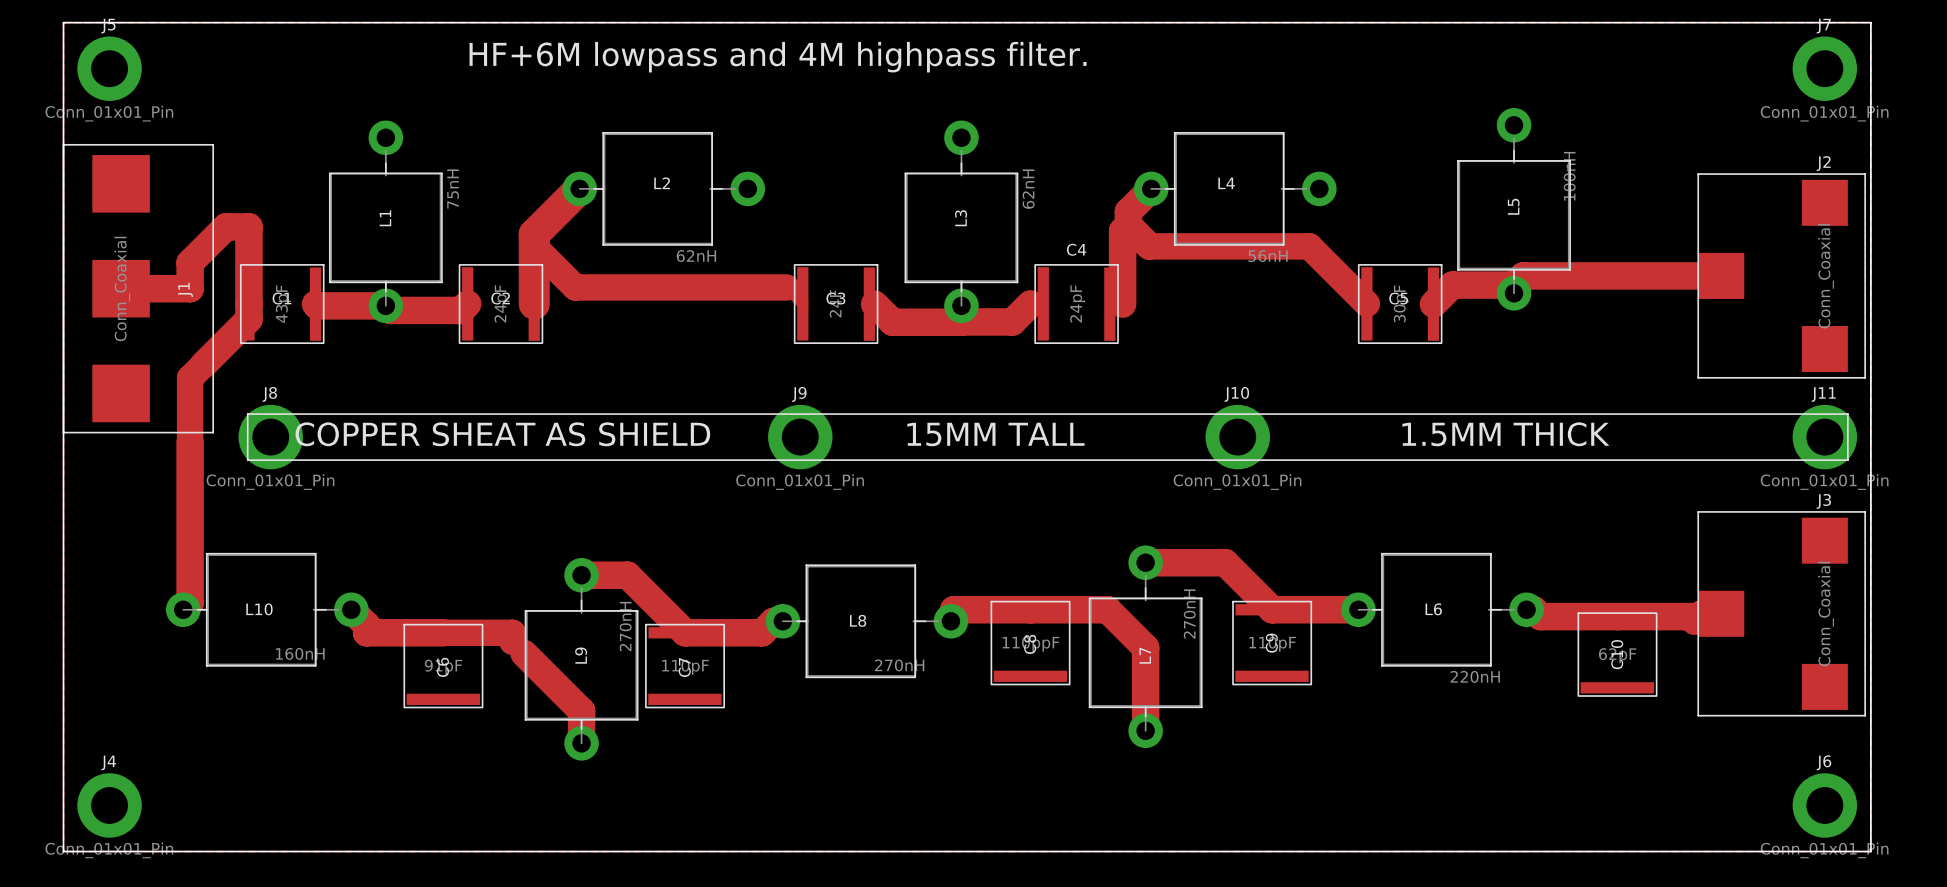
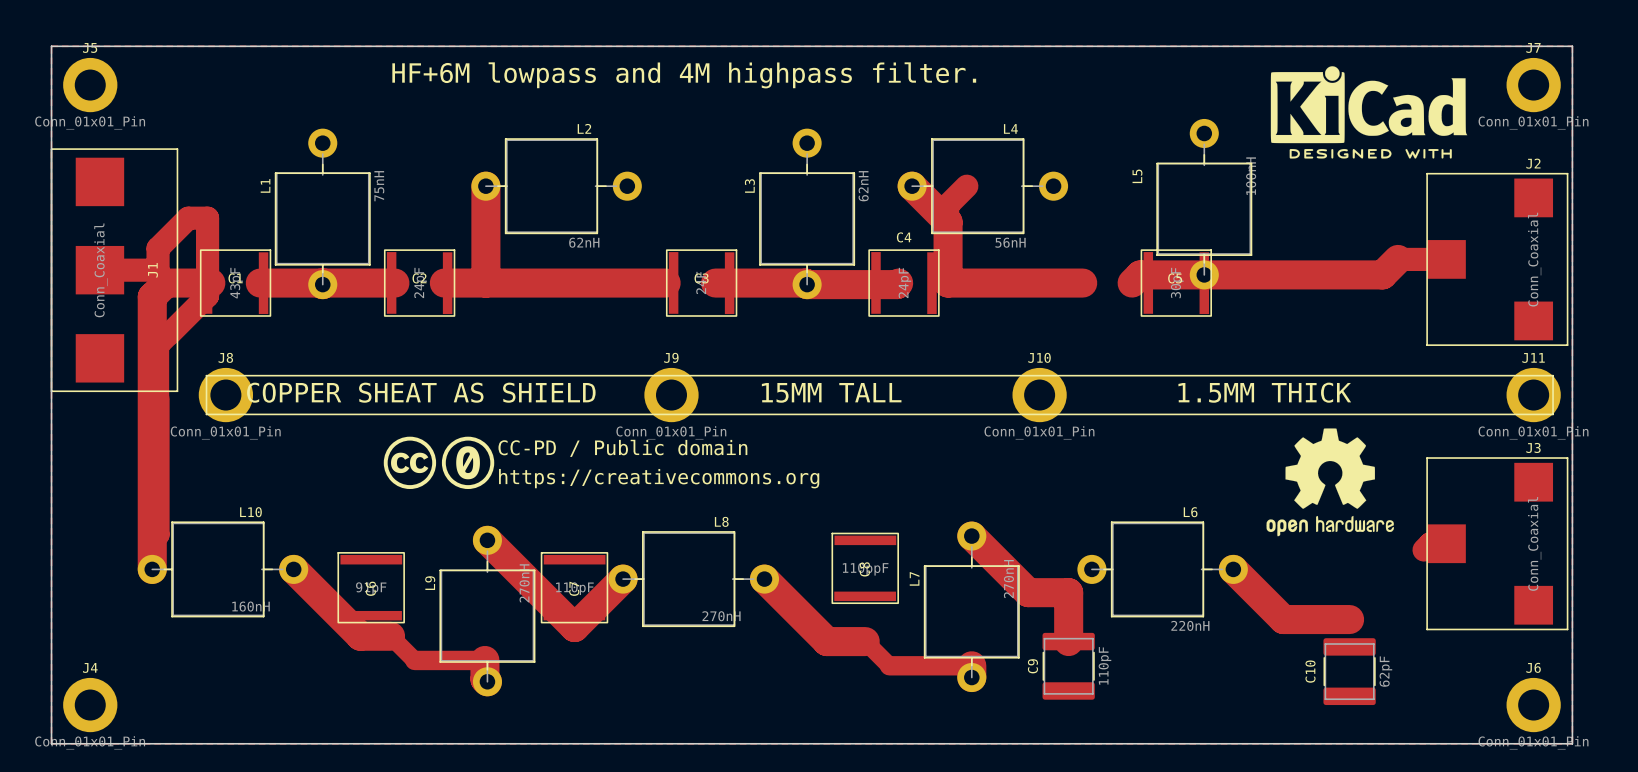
drawing: none -> [1270, 66, 1468, 159]
L2 name position: L2 (662, 183) -> L2 (584, 128)
L4 name position: L4 (1226, 183) -> L4 (1010, 128)
track: (579, 188) (534, 234) (534, 304) -> (485, 186) (485, 283)
track: none -> (912, 186) (948, 222) (948, 283) (1082, 283)
L4 position: (1235, 188) -> (982, 186)
L5 name position: L5 (1513, 206) -> L5 (1137, 176)
L5 position: (1514, 209) -> (1204, 204)
L1 name position: L1 (385, 218) -> L1 (265, 185)
L3 name position: L3 (961, 218) -> L3 (749, 185)
track: (534, 246) (575, 287) (786, 287) (802, 303) -> none
track: (1663, 275) (1523, 275) (1514, 285) -> (1398, 259) (1382, 274) (1140, 274) (1132, 283)
track: (1514, 285) (1452, 285) (1433, 304) -> none
track: (467, 303) (461, 310) (390, 310) (385, 305) (317, 305) (315, 304) -> none
track: (1030, 303) (1012, 321) (961, 322) -> none
track: (1366, 303) (1309, 246) (1149, 246) (1128, 225) (1122, 231) (1122, 304) -> none
track: none -> (210, 283) (166, 283) (152, 296) (152, 569)
track: none -> (260, 283) (321, 283) (322, 284) (324, 283) (394, 283)
track: none -> (444, 283) (666, 283)
track: none -> (715, 283) (805, 283) (807, 284) (897, 284) (898, 283)
track: (874, 304) (892, 322) (961, 322) -> none
drawing: none -> [1266, 428, 1394, 537]
drawing: none -> [383, 436, 495, 490]
track: (1145, 562) (1225, 562) (1272, 609) (1358, 609) -> none
track: (581, 575) (627, 575) (685, 632) (762, 632) (773, 621) (782, 621) -> none
C9 footprint: [1232, 601, 1312, 686] -> [1042, 632, 1095, 700]
track: none -> (971, 536) (1028, 592) (1068, 592) (1068, 641)
L10 name position: L10 (259, 609) -> L10 (250, 512)
L10 position: (267, 609) -> (222, 569)
track: (351, 609) (366, 625) (366, 632) (512, 632) (512, 641) (581, 710) (581, 743) -> none
track: none -> (487, 540) (574, 627) (623, 579)
L6 name position: L6 (1433, 609) -> L6 (1190, 512)
L6 position: (1442, 609) -> (1162, 569)
track: (1526, 609) (1533, 609) (1540, 616) (1694, 616) -> none
C10 footprint: [1577, 612, 1658, 697] -> [1323, 638, 1376, 706]
L8 name position: L8 (858, 620) -> L8 (721, 521)
L8 position: (866, 621) -> (693, 579)
track: (950, 621) (953, 618) (953, 609) (1107, 609) (1145, 647) (1145, 730) -> none
C9 name position: C9 (1271, 643) -> C9 (1032, 666)
track: none -> (293, 569) (360, 636) (390, 636) (414, 660) (484, 660) (484, 679) (487, 681)
C9 value position: 110pF (1272, 644) -> 110pF (1104, 665)
track: none -> (1233, 569) (1283, 619) (1349, 619)
L7 position: (1145, 646) -> (971, 606)
C10 name position: C10 (1617, 654) -> C10 (1310, 671)
L9 name position: L9 (581, 655) -> L9 (430, 583)
track: none -> (764, 579) (826, 641) (865, 641) (889, 665) (971, 665) (971, 677)
L7 name position: L7 (1145, 655) -> L7 (914, 578)
C10 value position: 62pF (1617, 655) -> 62pF (1385, 671)
L9 position: (581, 659) -> (487, 611)

